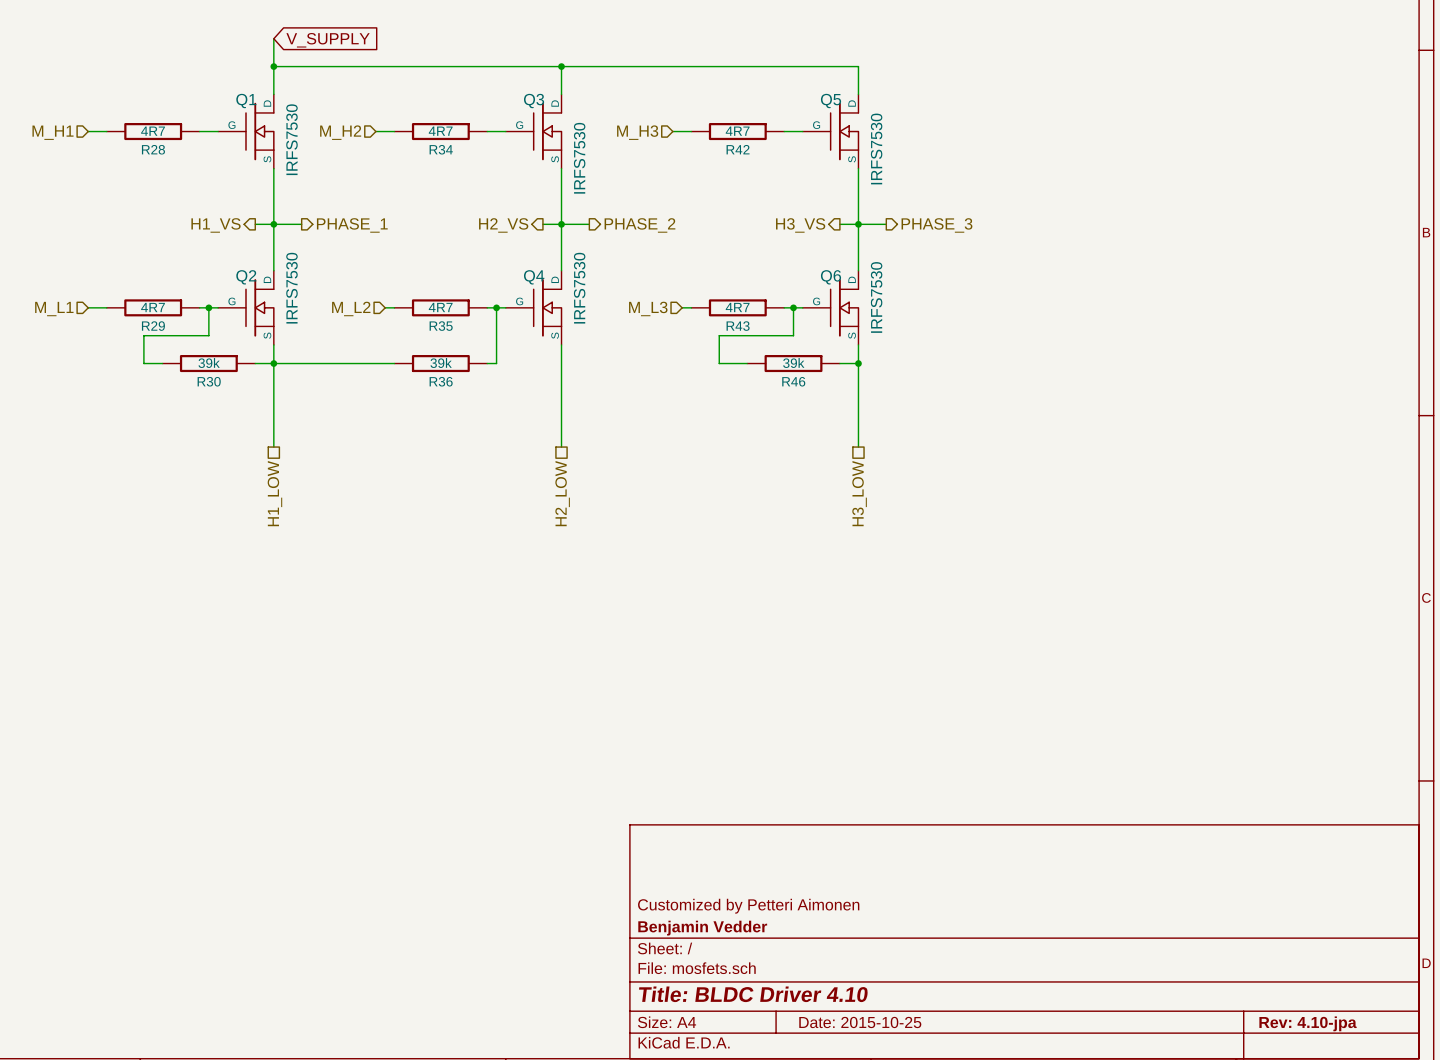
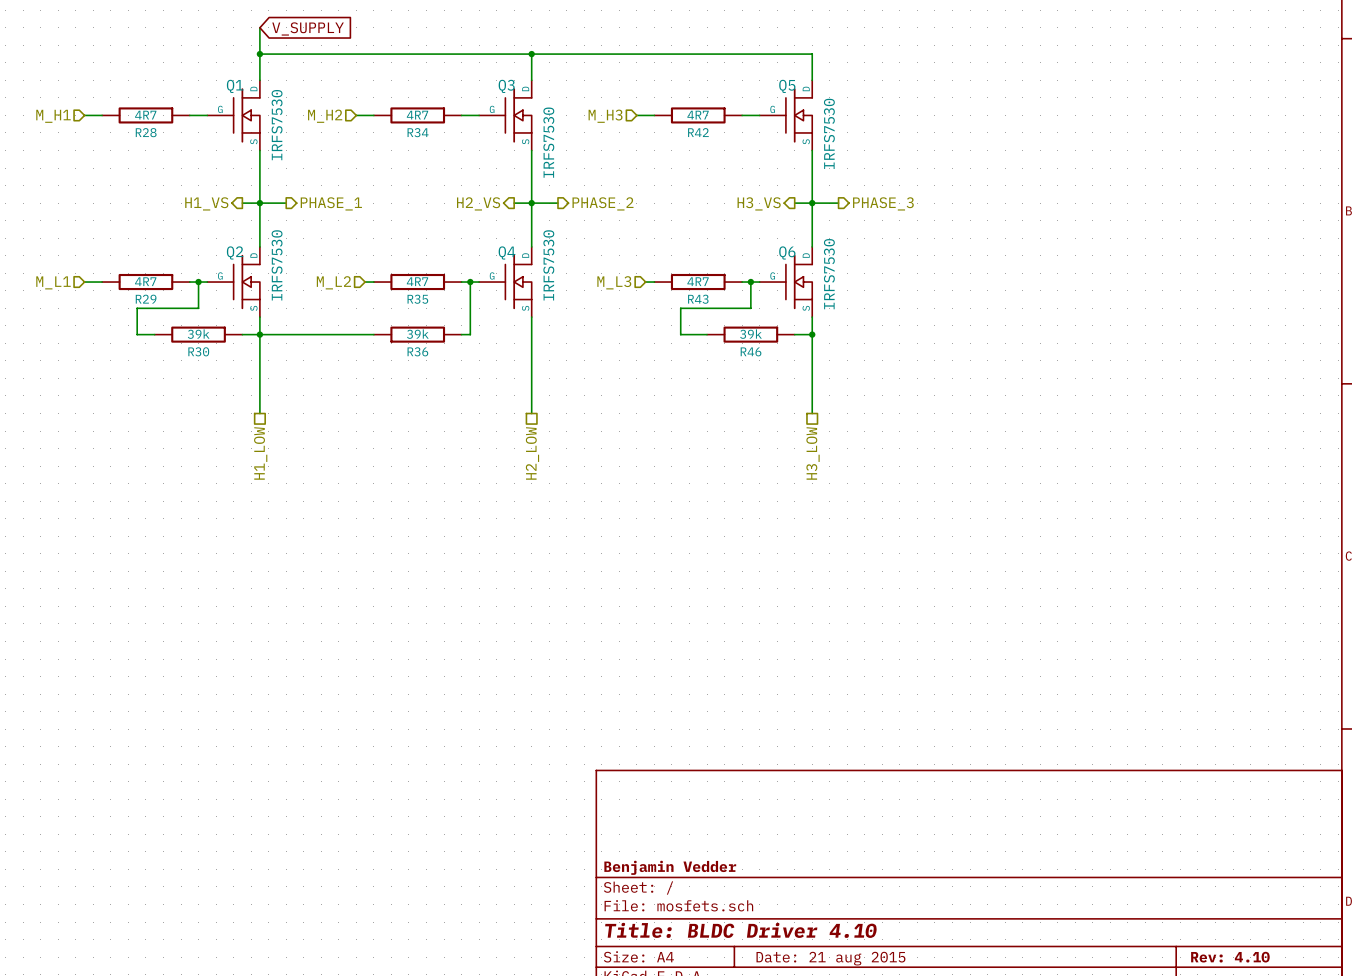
title block: Customized by Petteri Aimonen (748, 906) -> none
title block: Date: 2015-10-25 (860, 1022) -> Date: 21 aug 2015 (830, 958)
title block: Rev: 4.10-jpa (1308, 1023) -> Rev: 4.10 (1230, 957)

